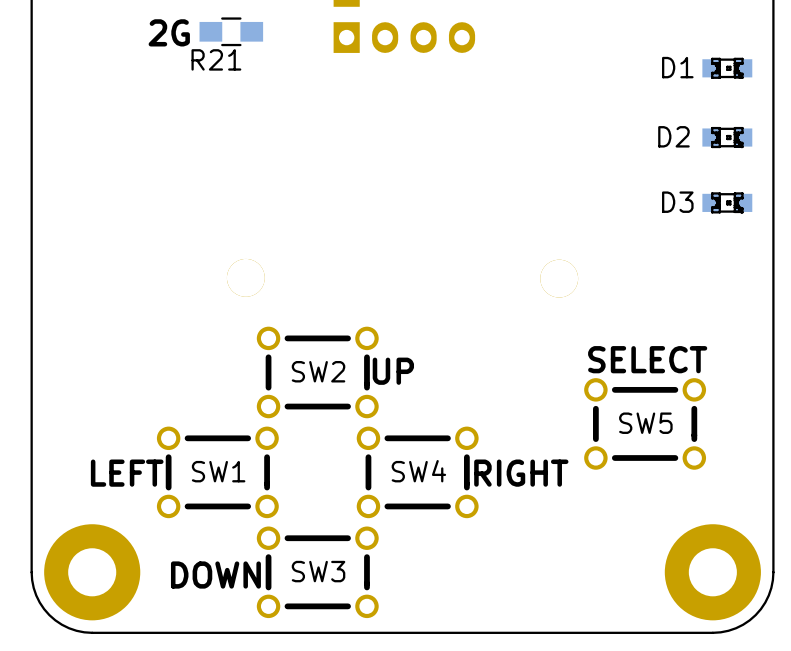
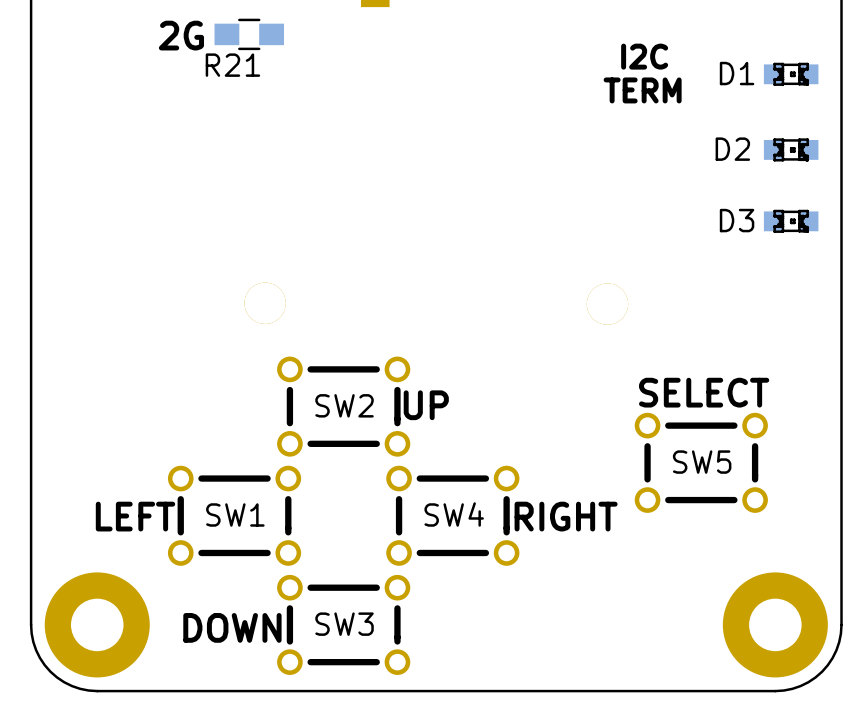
part: (404, 37) -> none
text: none -> I2C (644, 56)
text: none -> TERM (642, 90)

